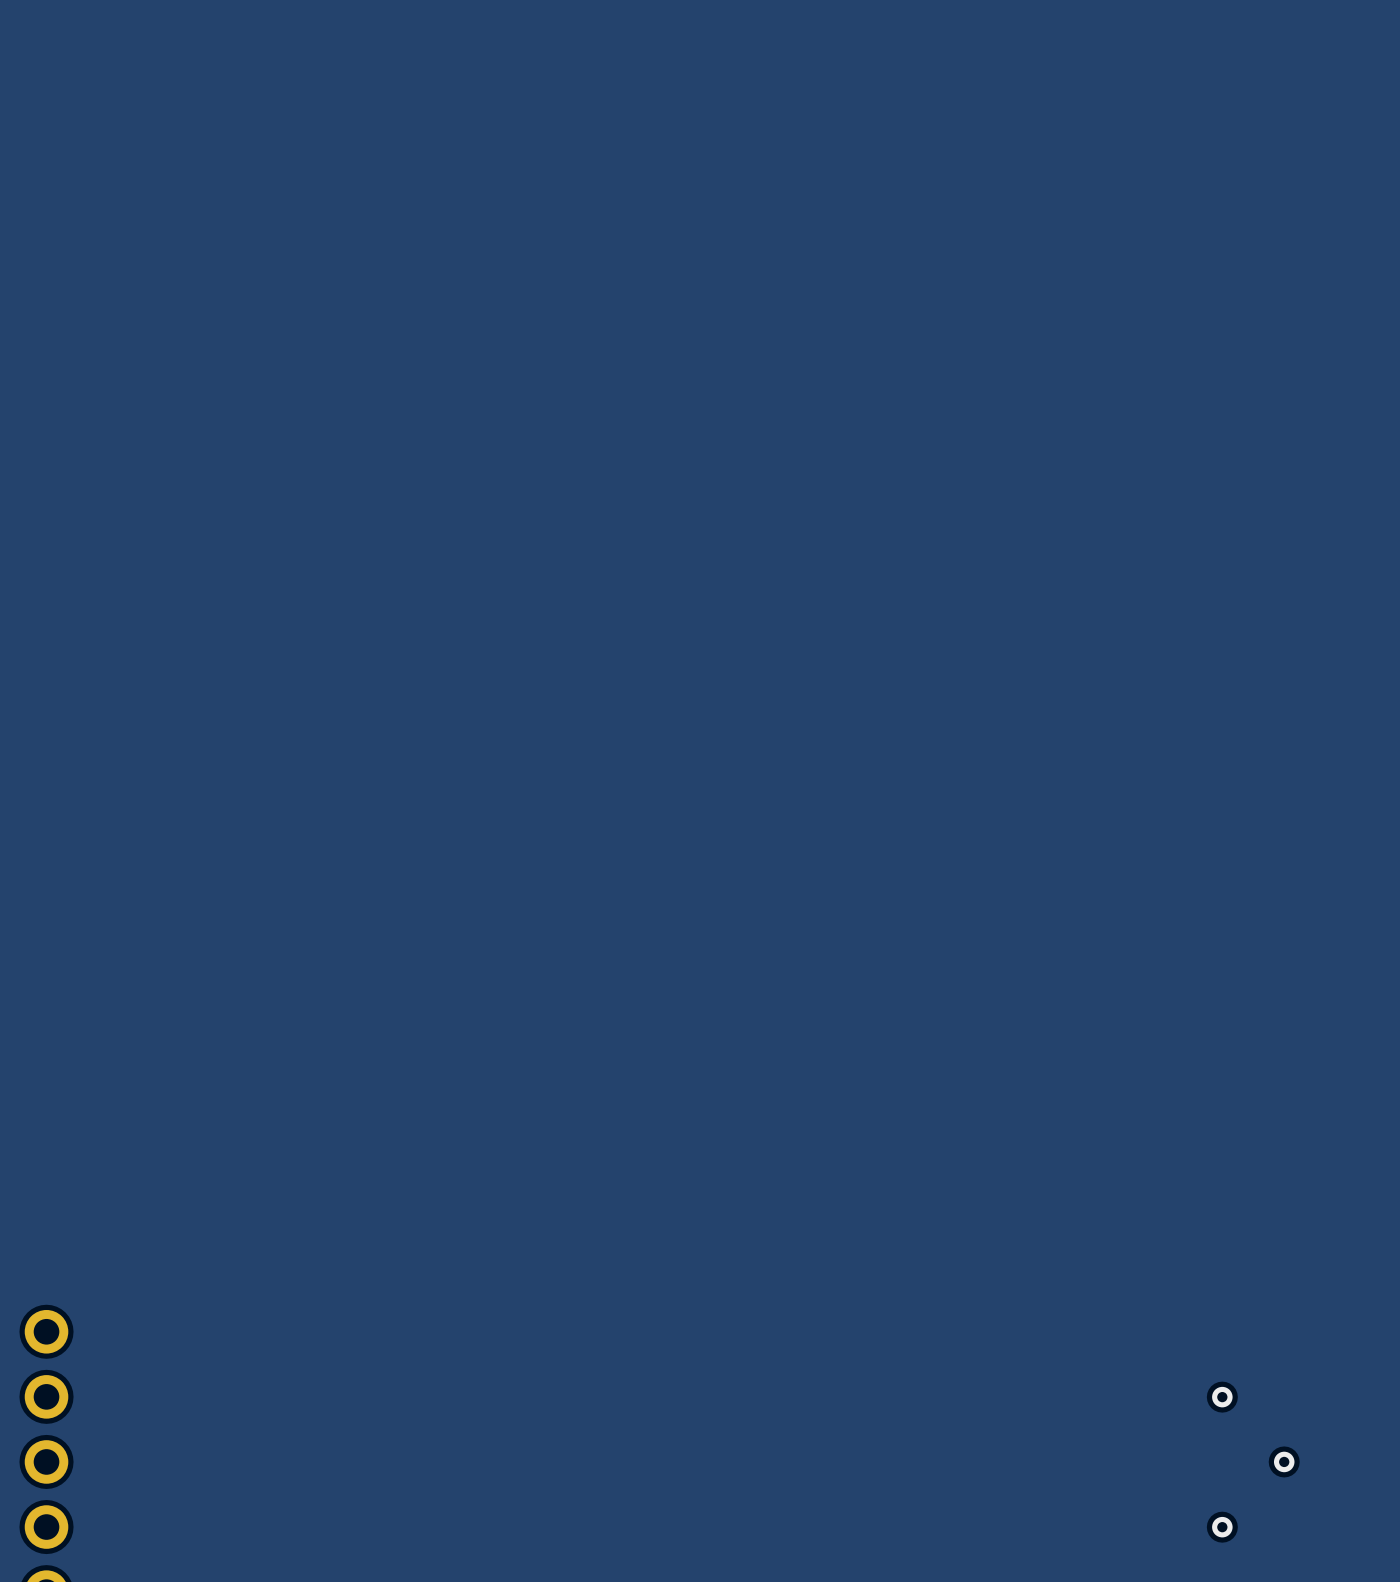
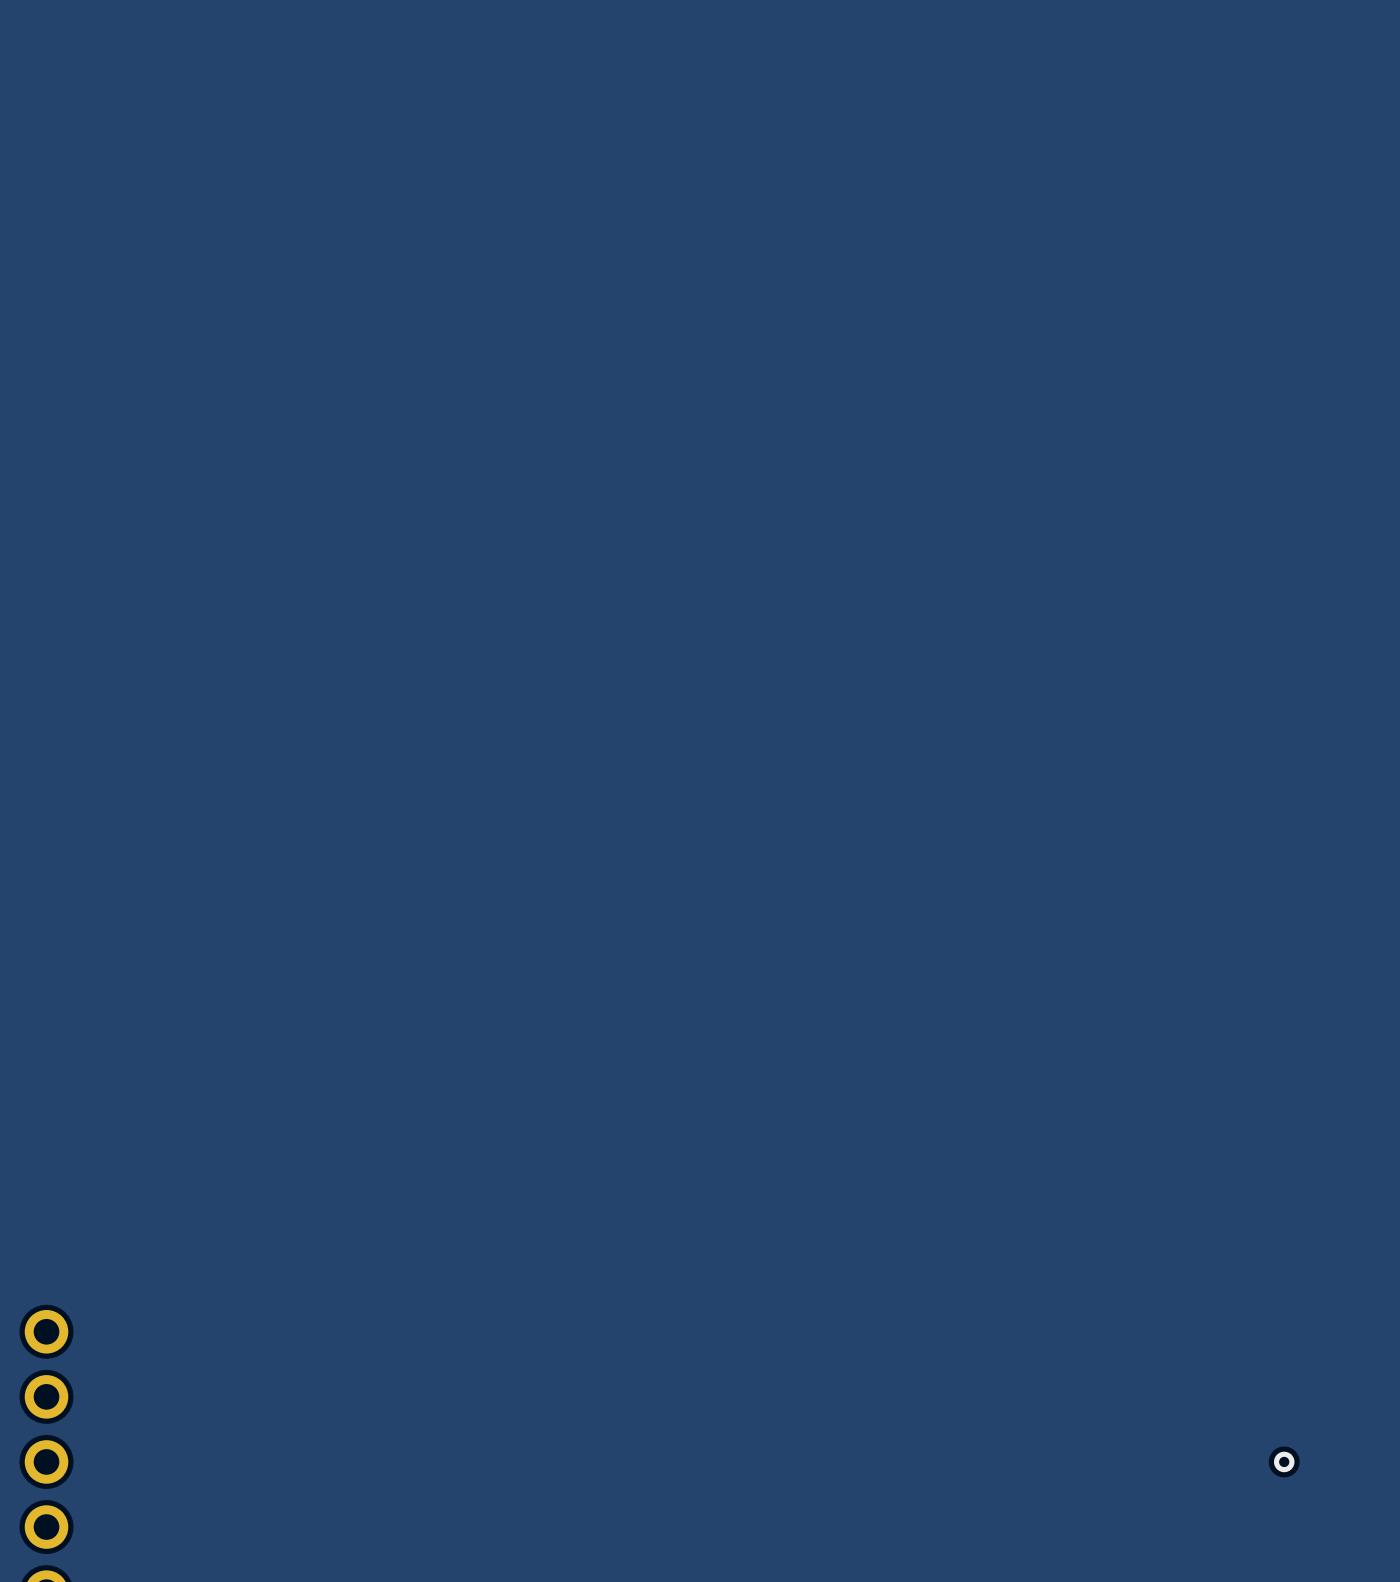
via: (1222, 1397) -> none
via: (1222, 1527) -> none

